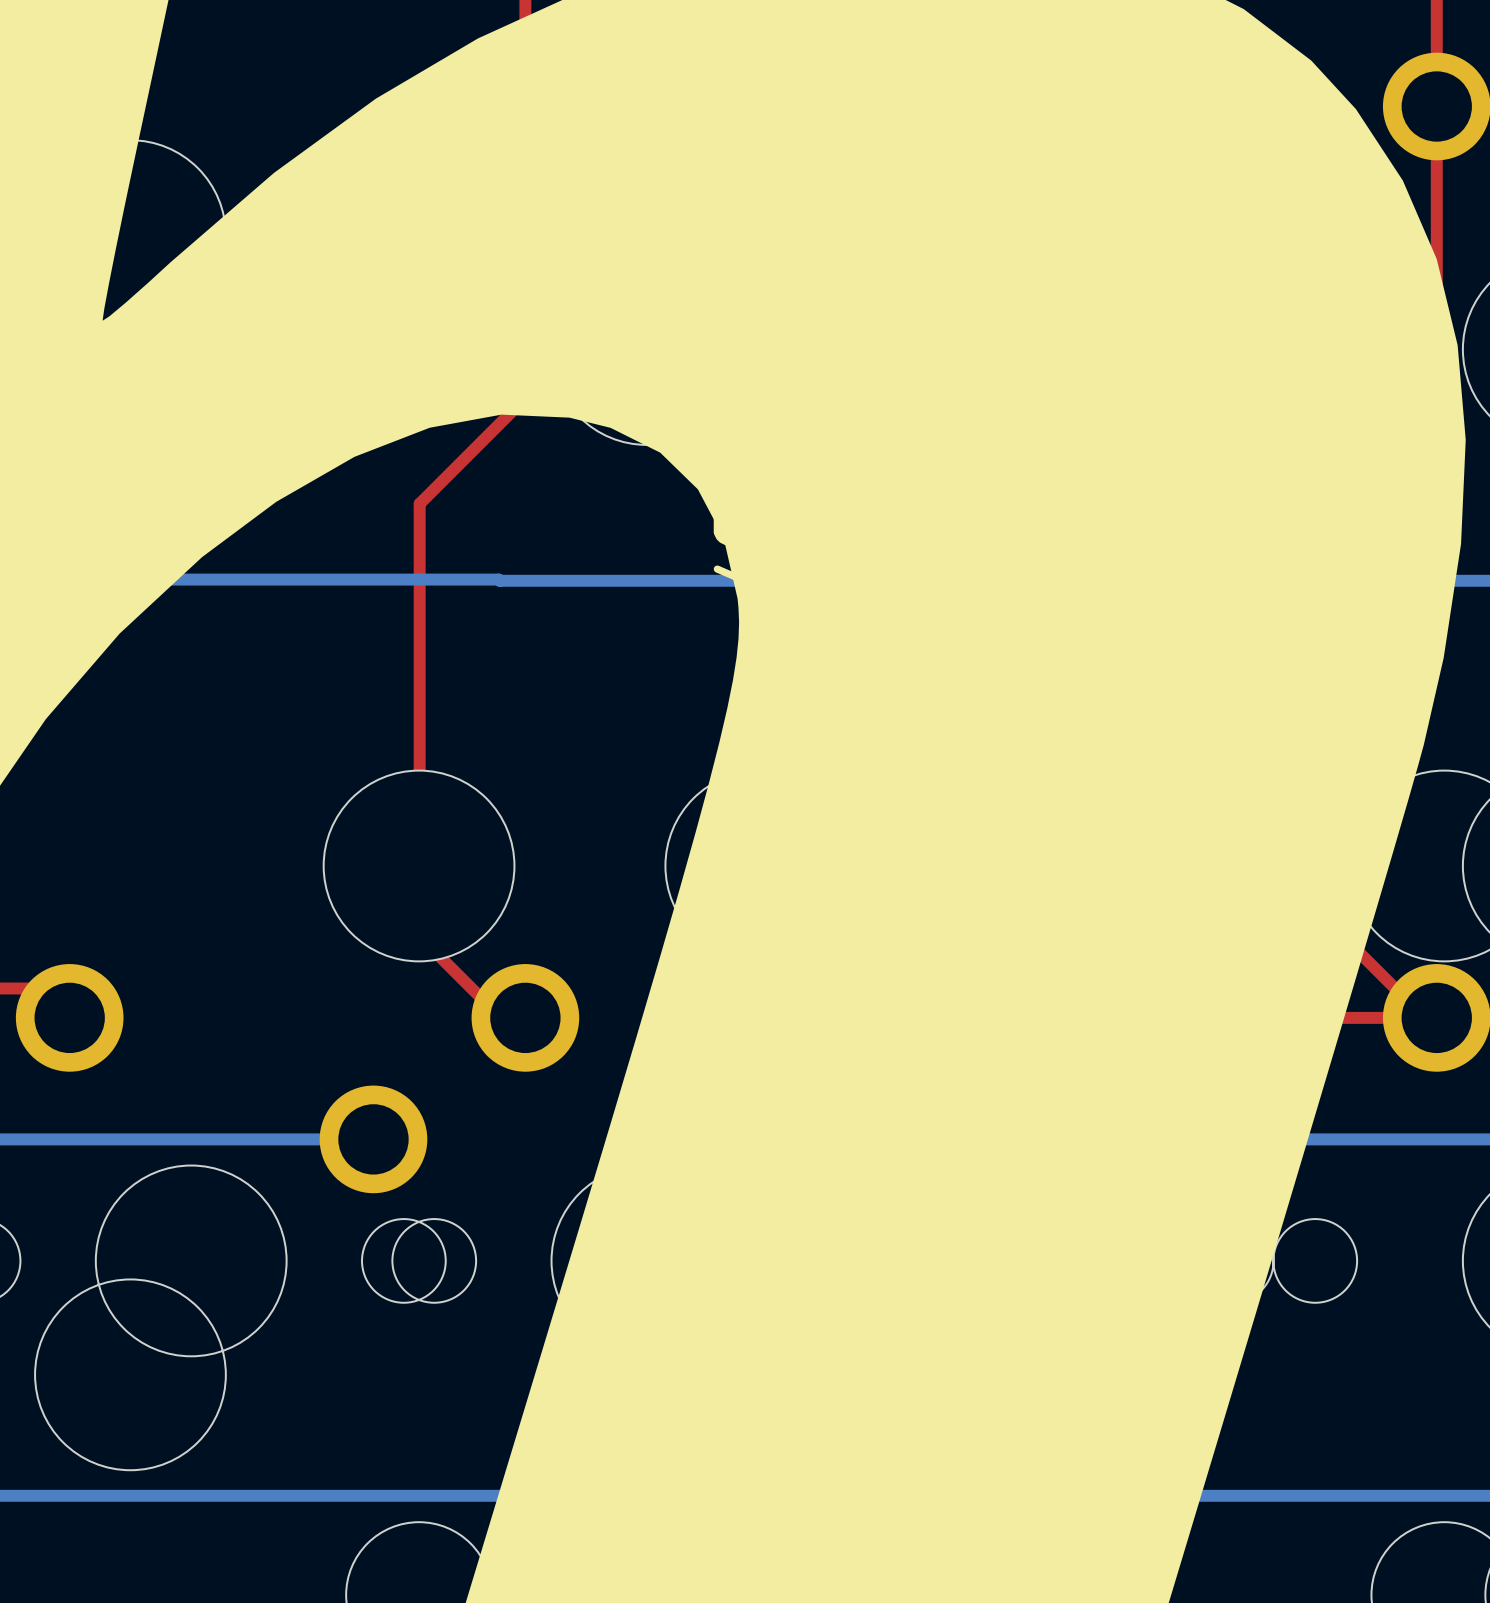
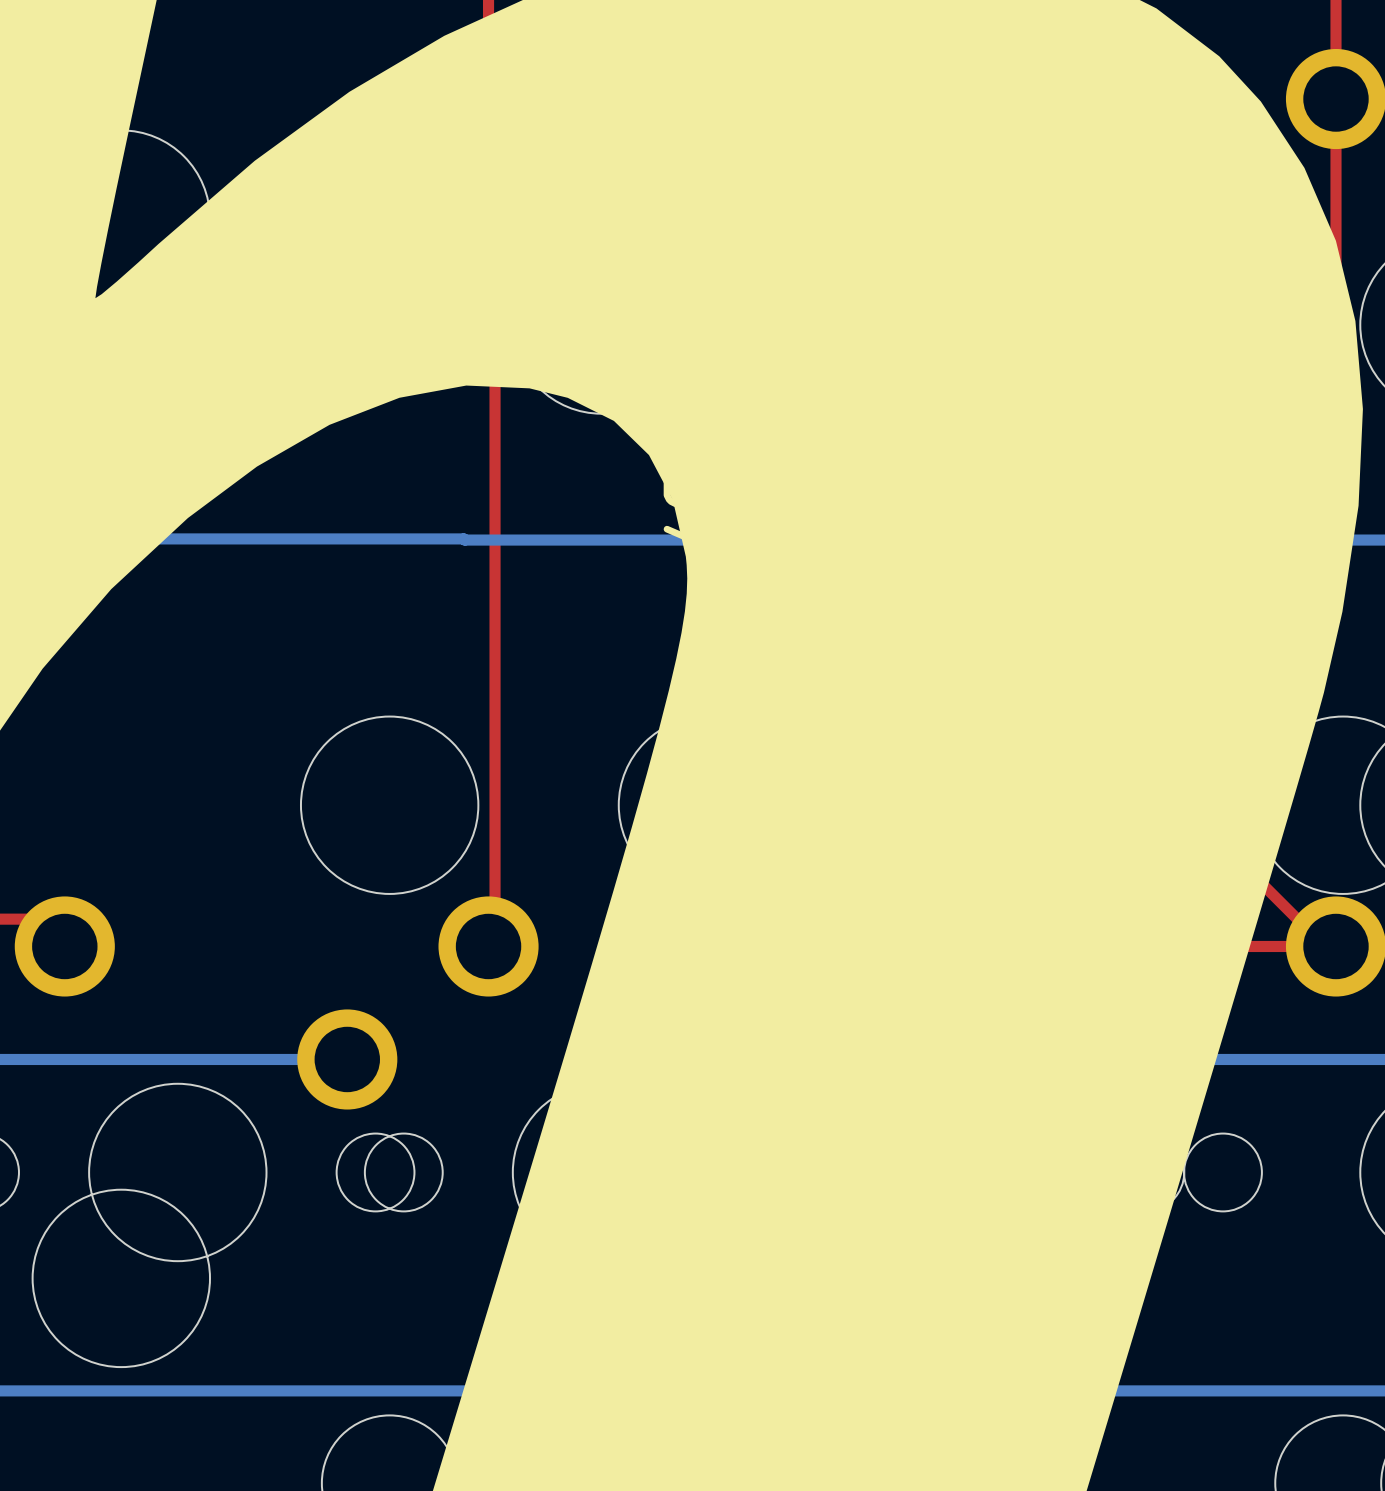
top track: (525, 106) (525, 398) (419, 503) (419, 936) (501, 1017) (525, 1017) -> (488, 99) (495, 105) (495, 939) (488, 946)

